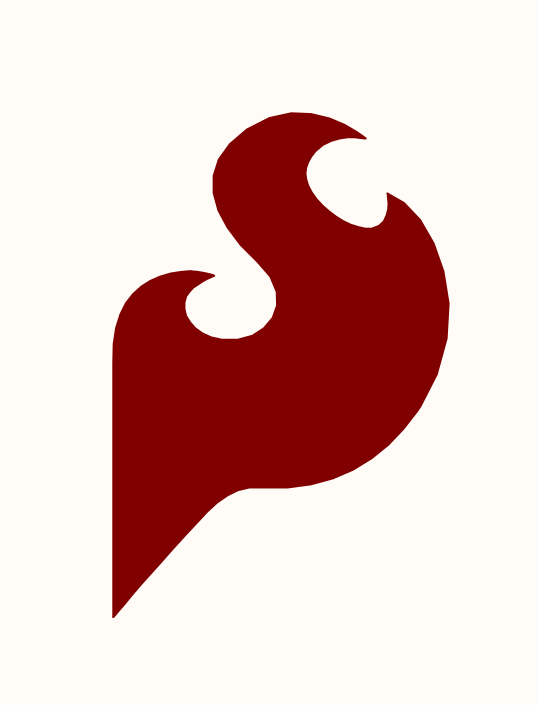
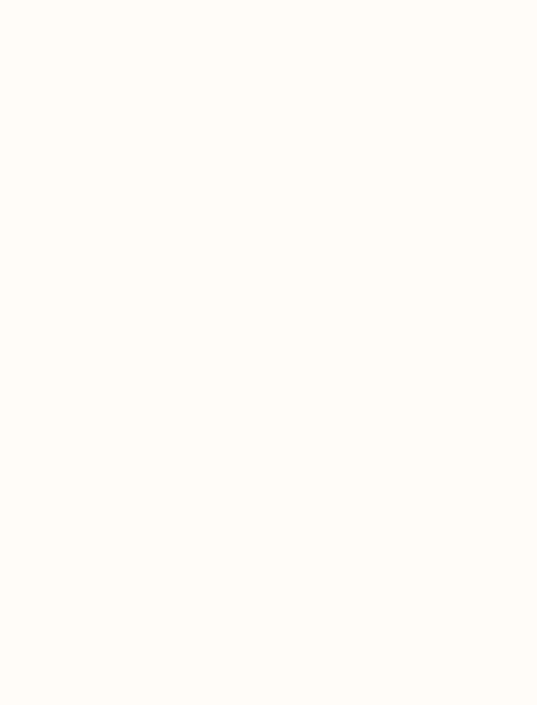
part: (280, 365) -> none

